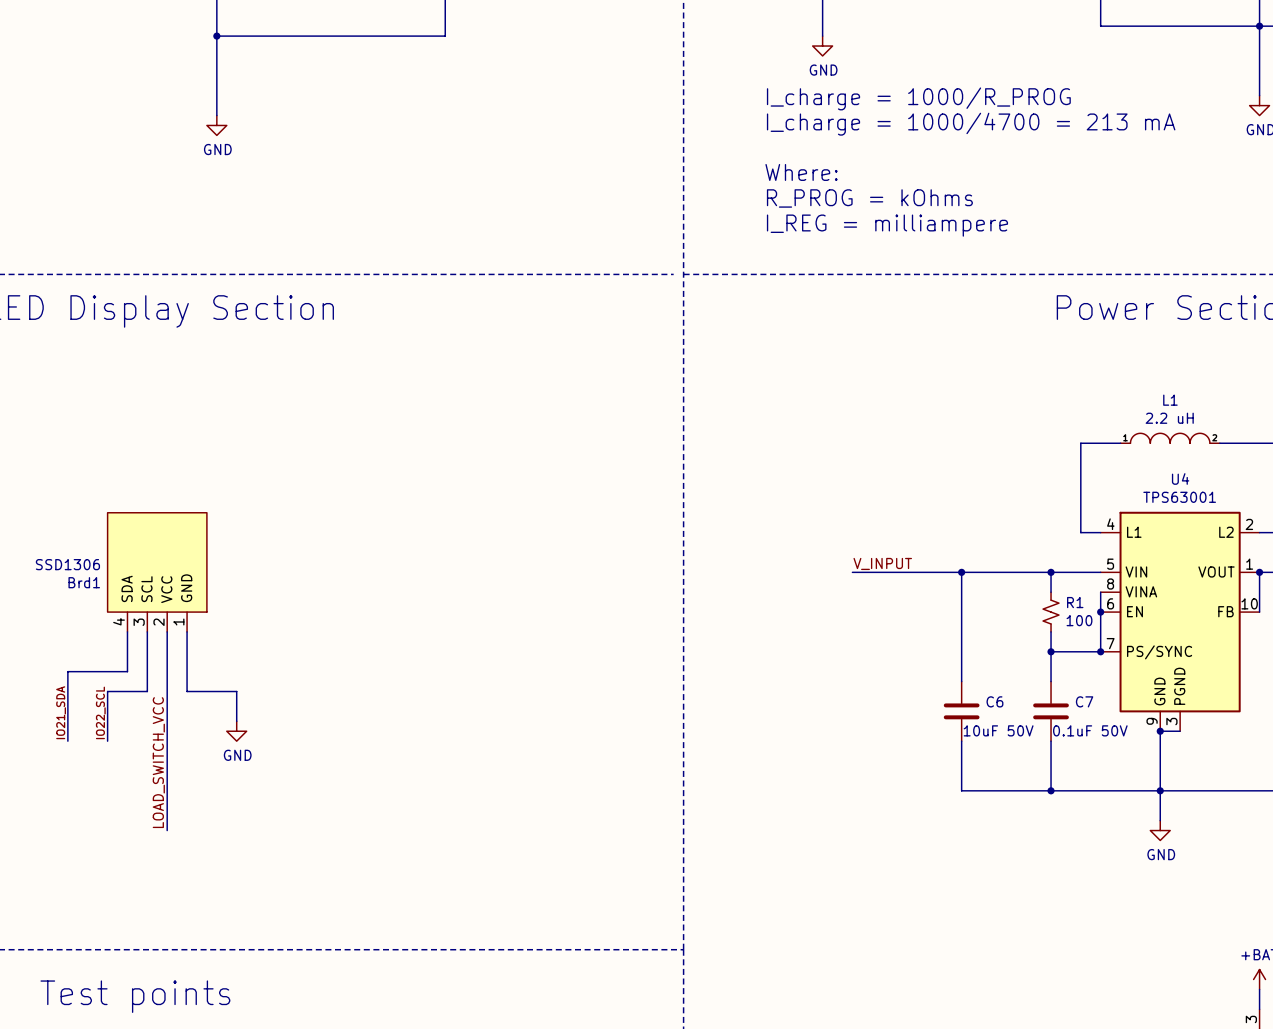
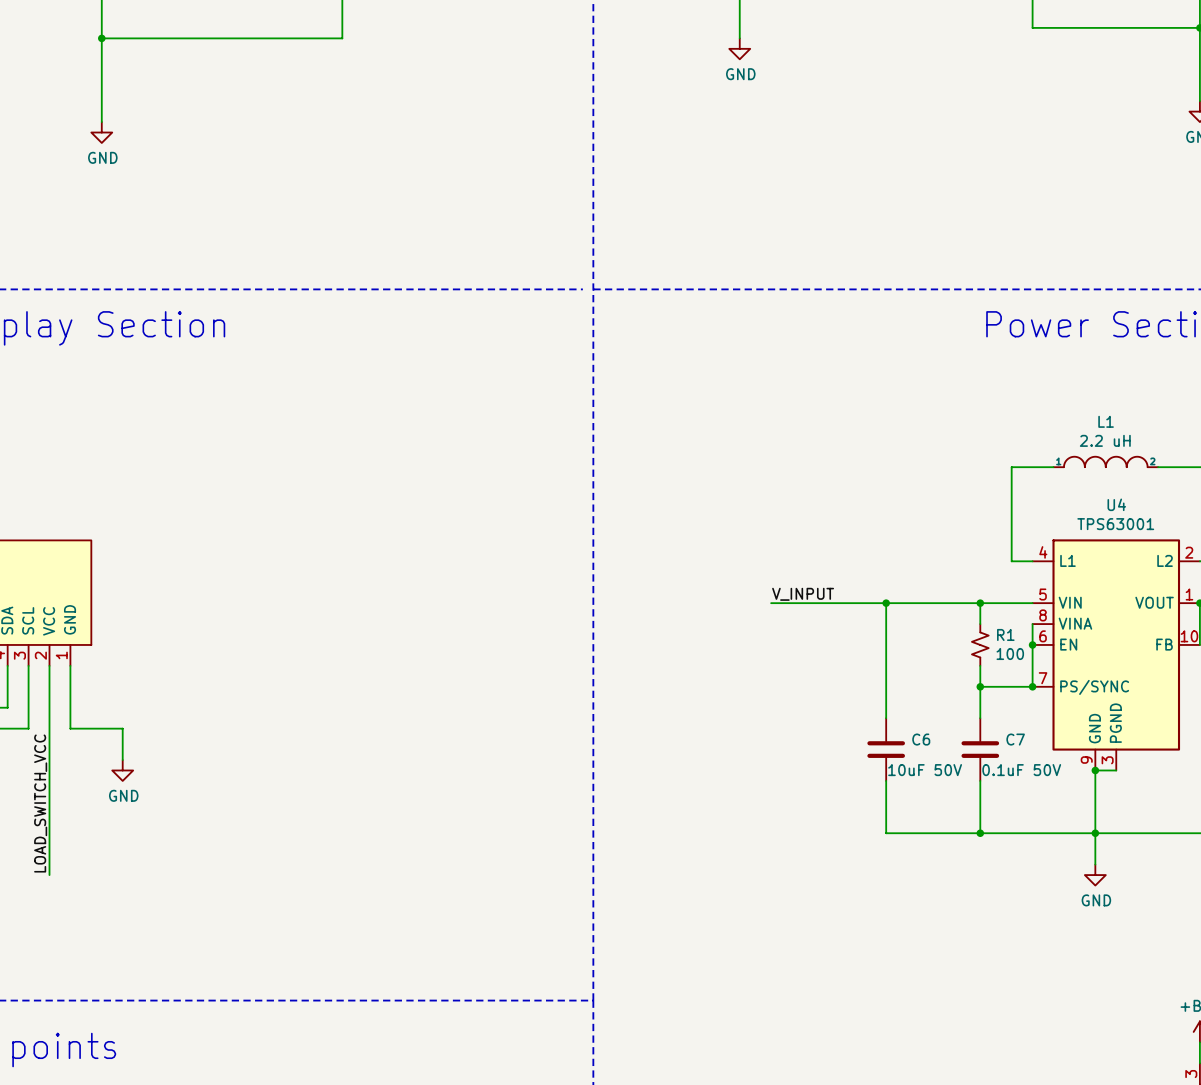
text: I_charge = 1000/R_PROG (918, 98) -> none
text: I_charge = 1000/4700 = 213 mA (971, 124) -> none
text: Where: (801, 172) -> none
text: R_PROG = kOhms (869, 198) -> none
text: I_REG = milliampere (887, 225) -> none

